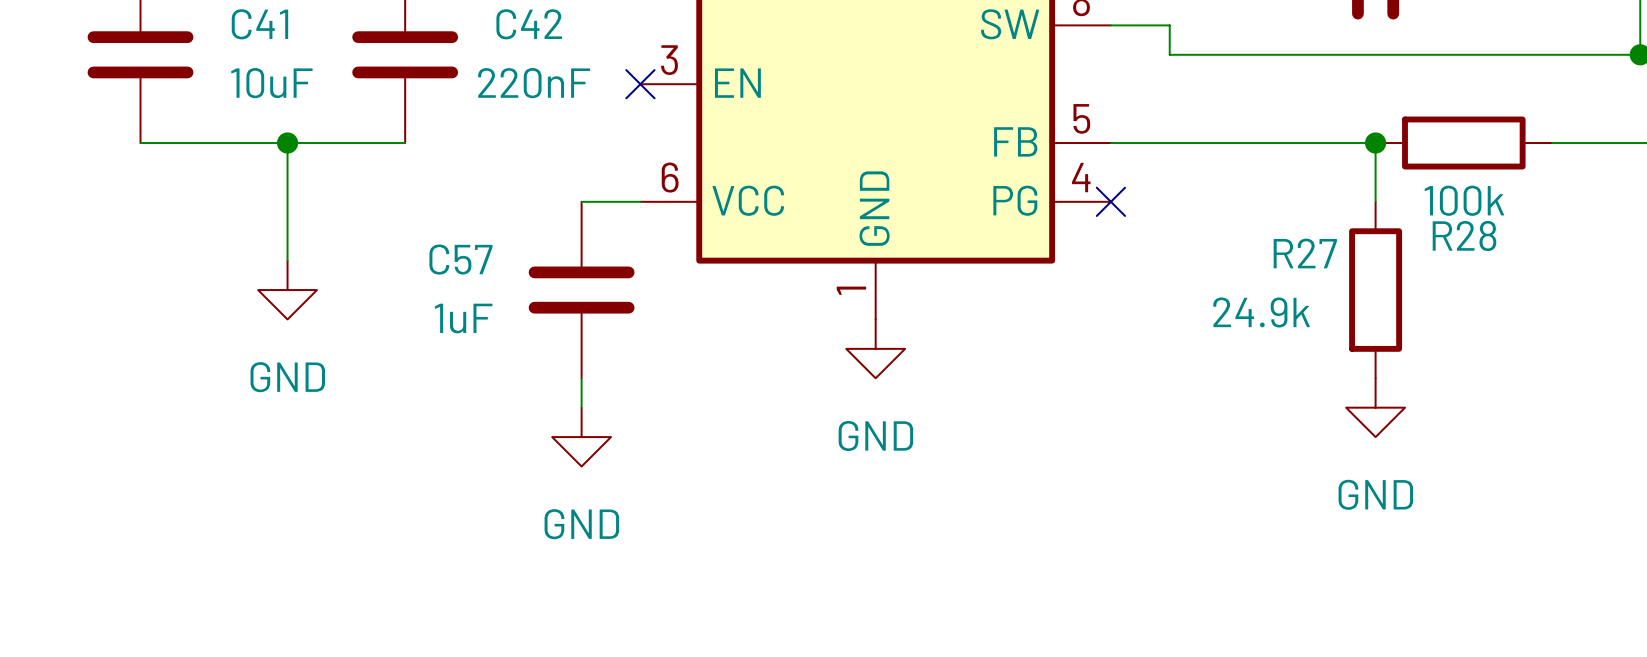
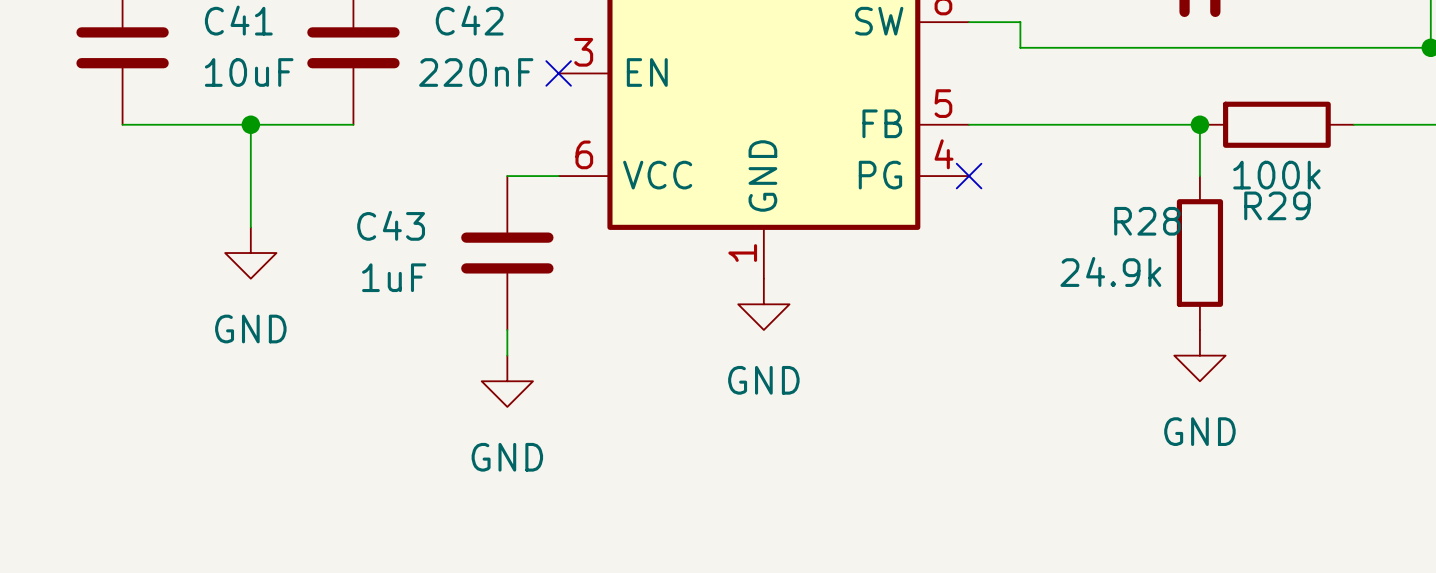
R28 name: R28 (1464, 235) -> R29 (1277, 205)
R27 name: R27 (1305, 253) -> R28 (1147, 221)
C57 name: C57 (460, 259) -> C43 (391, 225)

